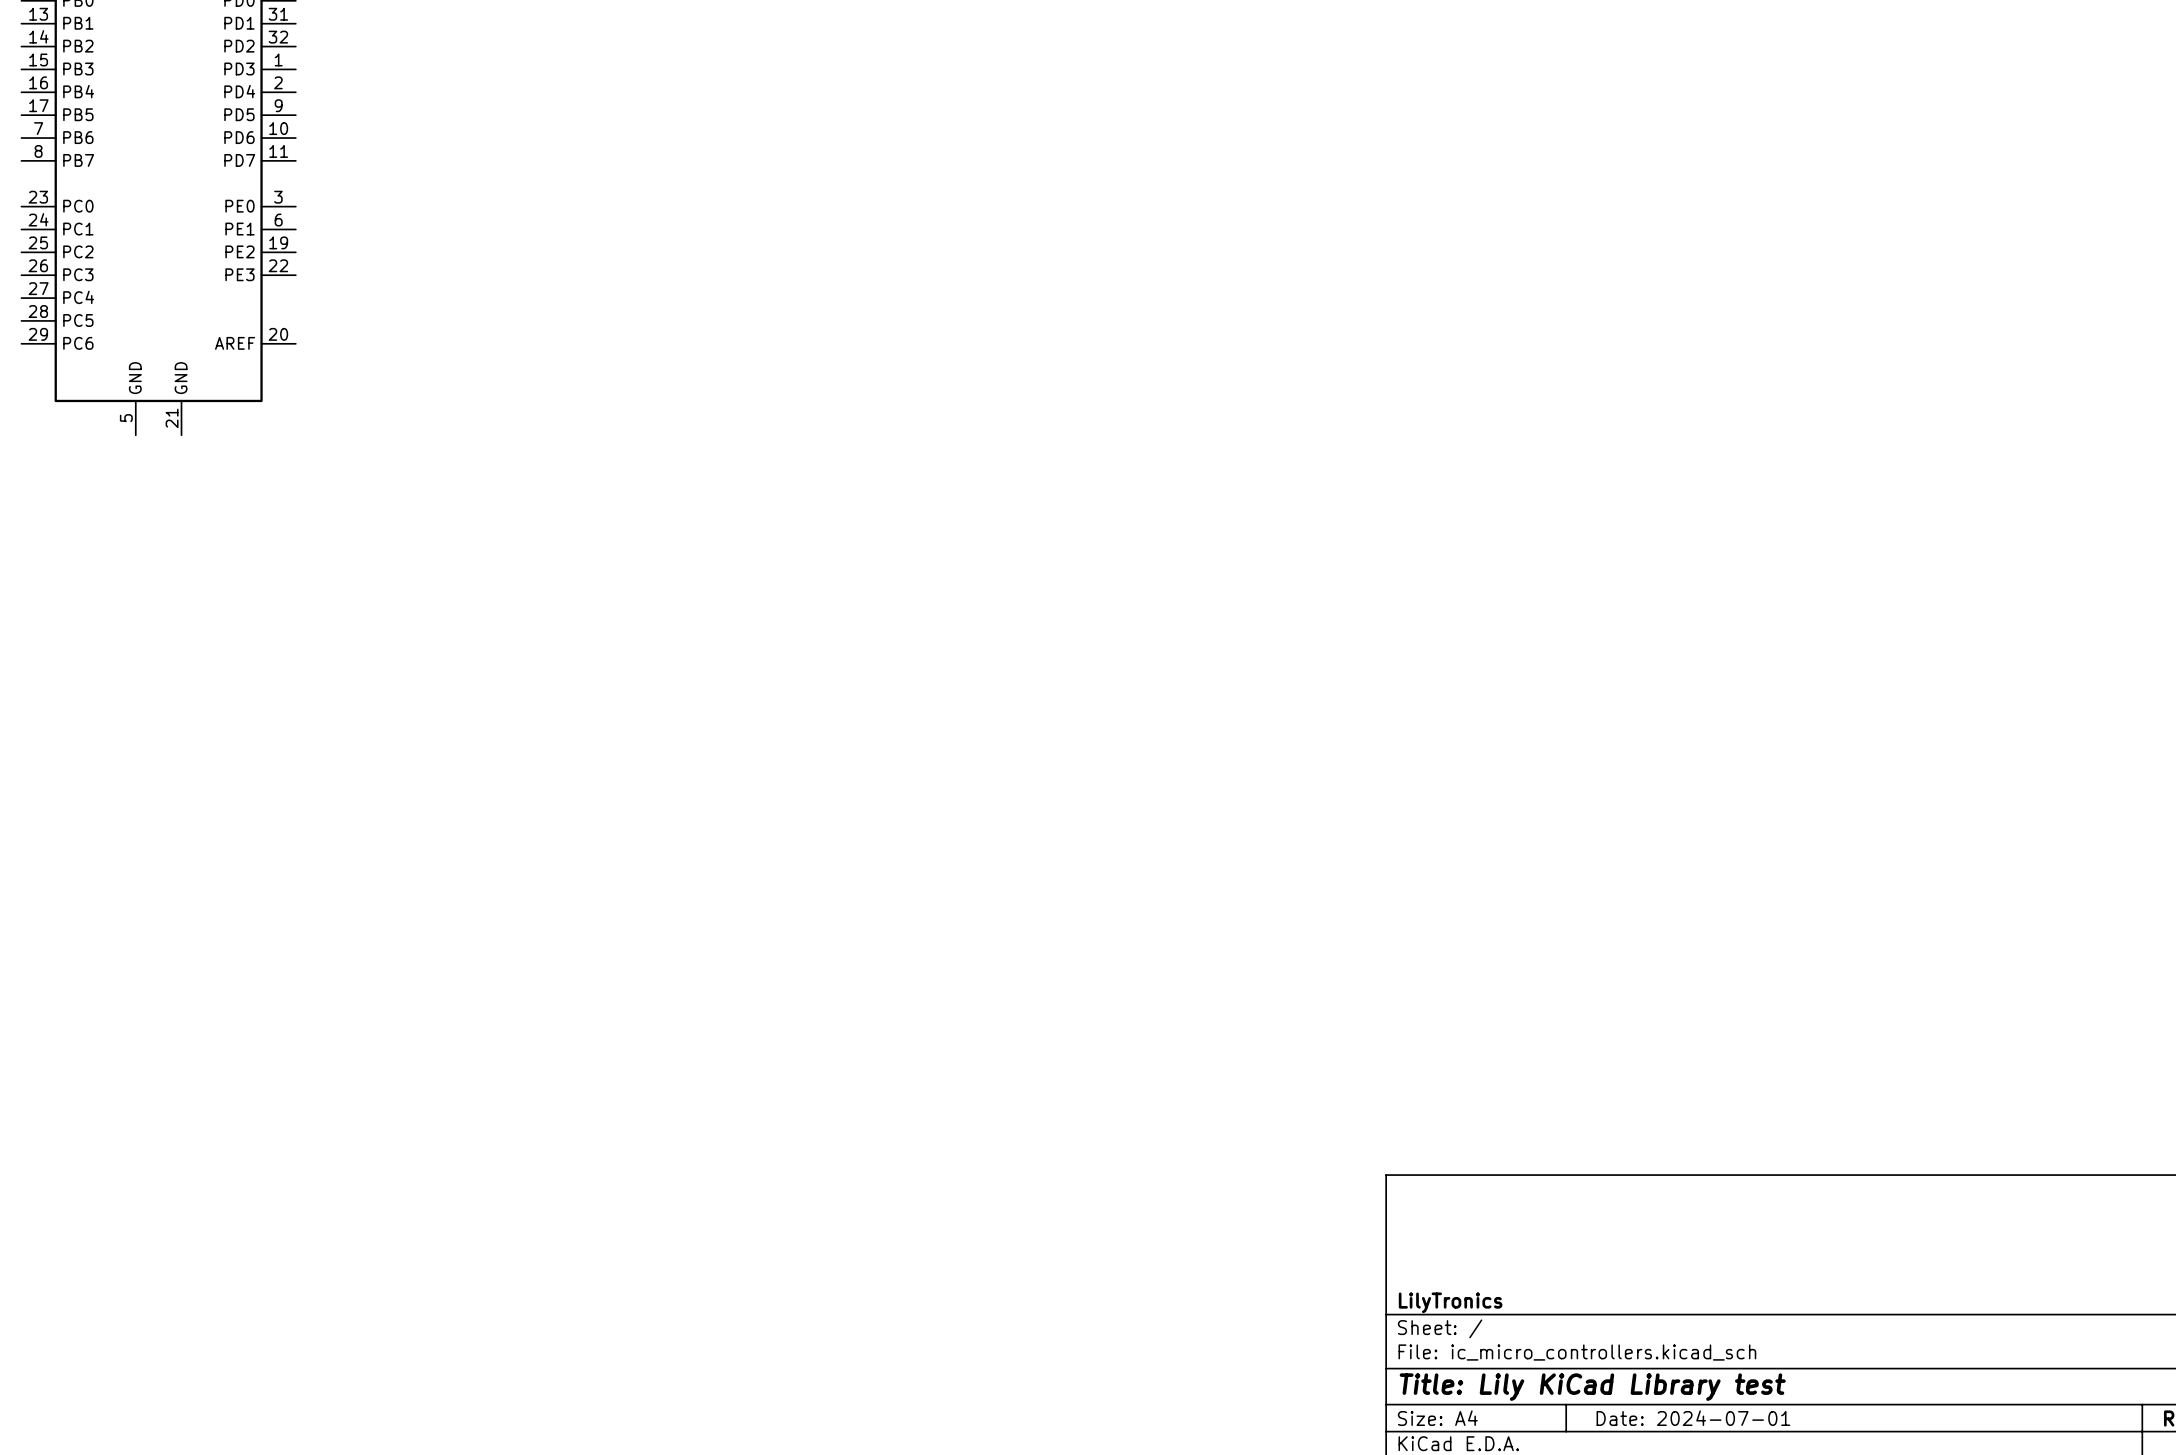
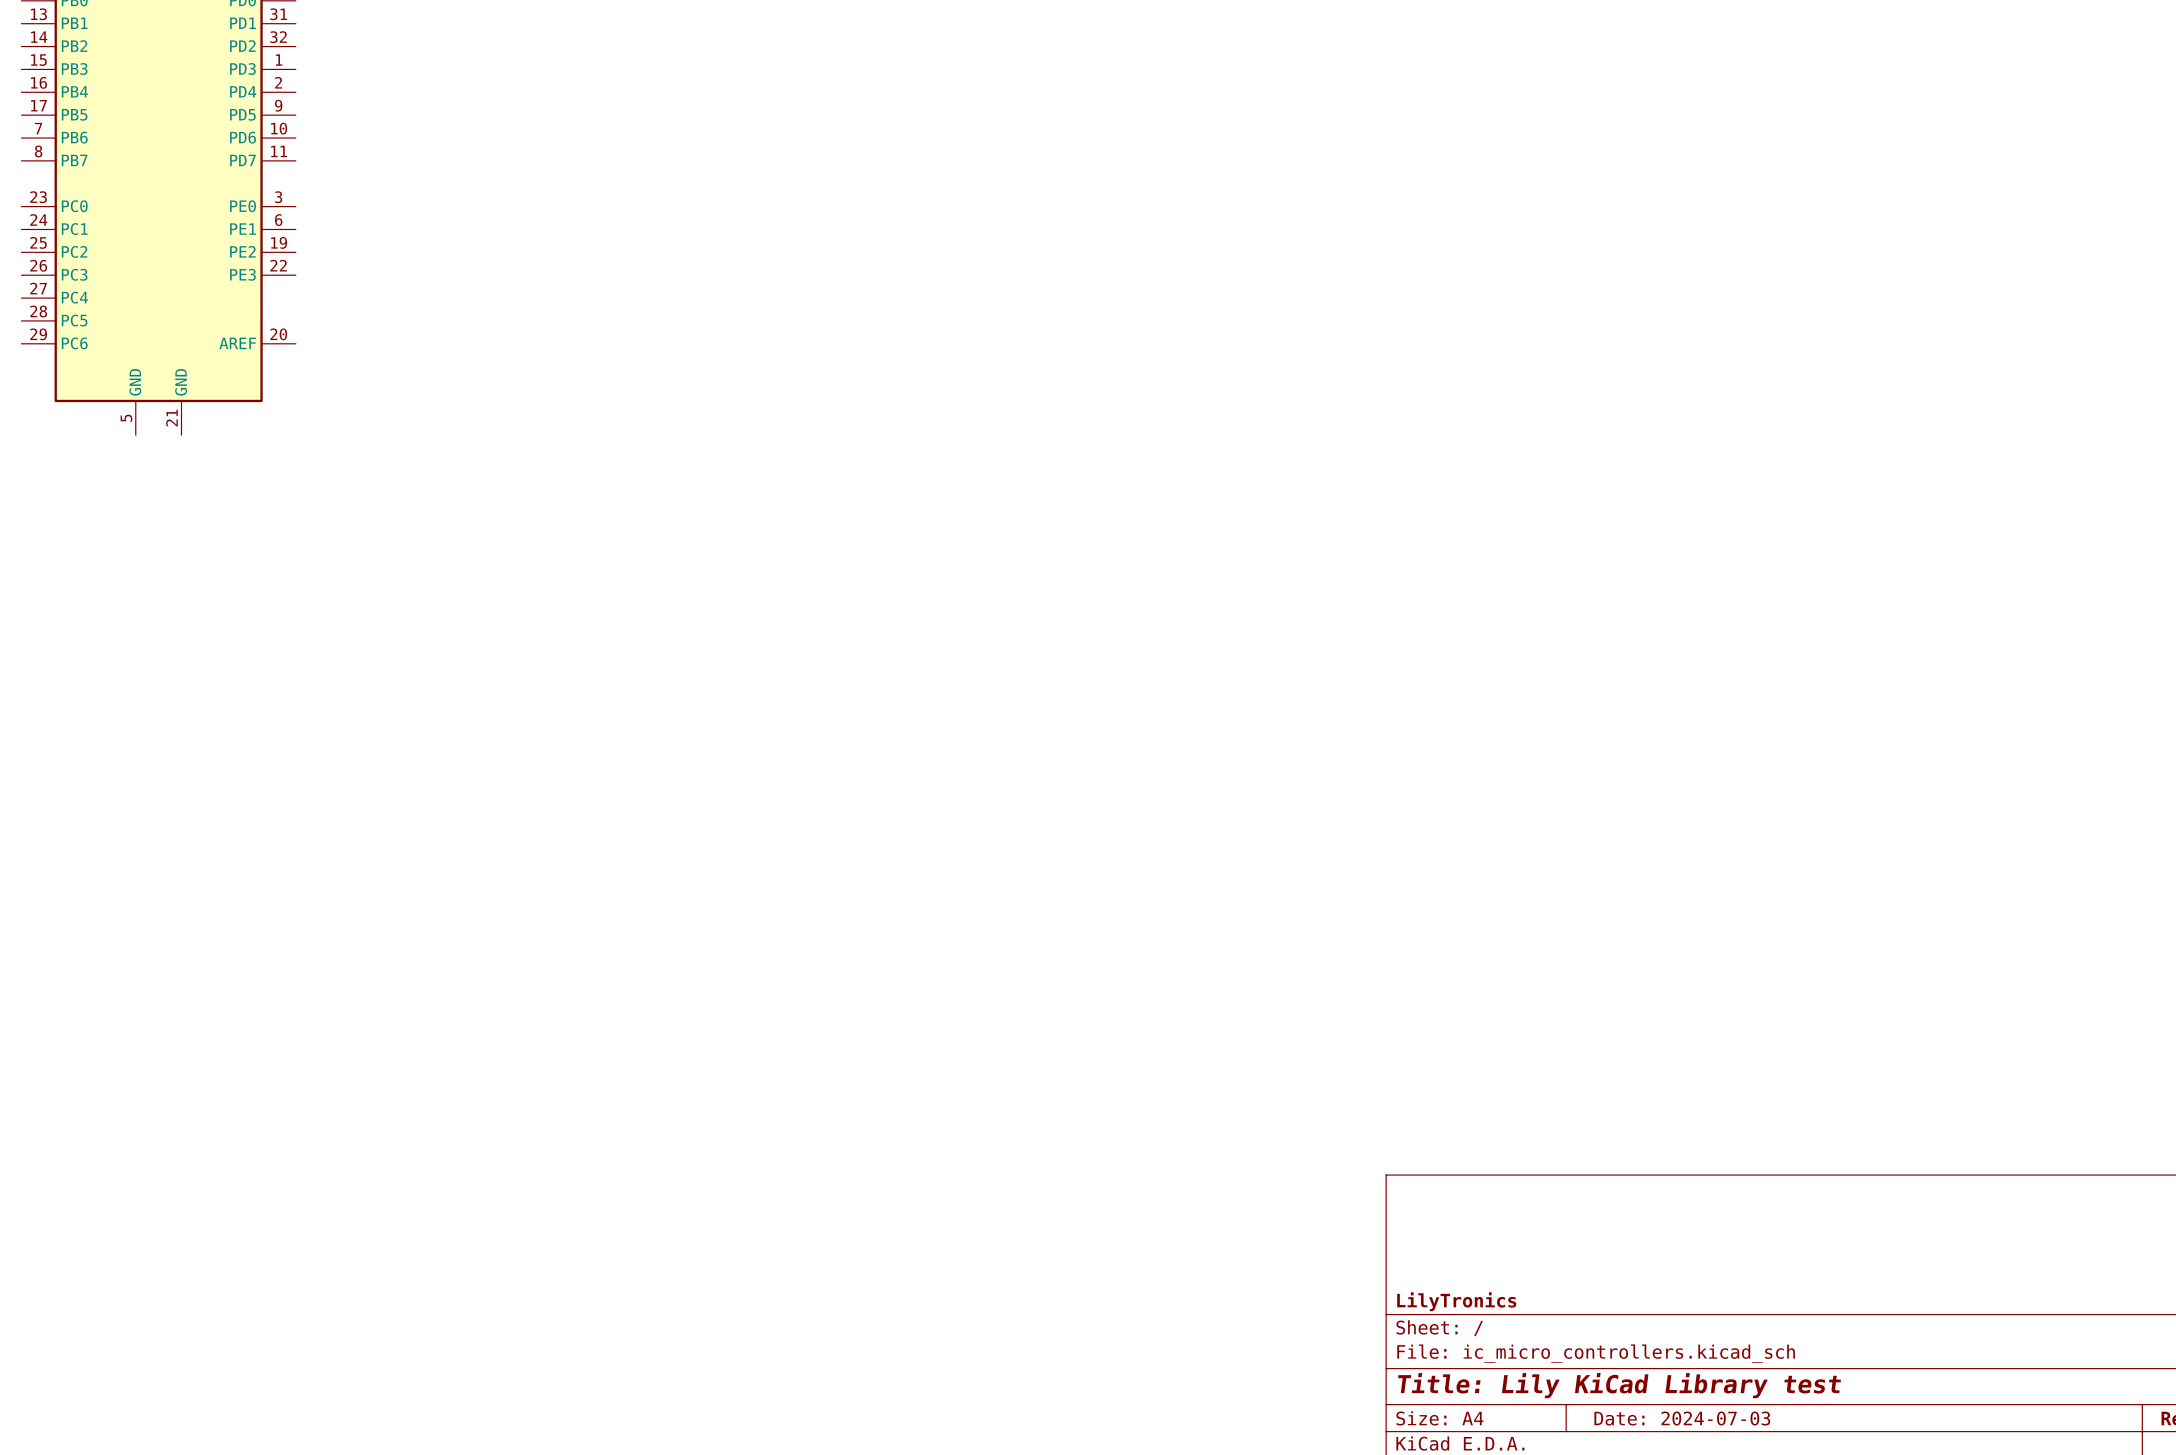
title block: Date: 2024-07-01 (1693, 1418) -> Date: 2024-07-03 (1682, 1418)

